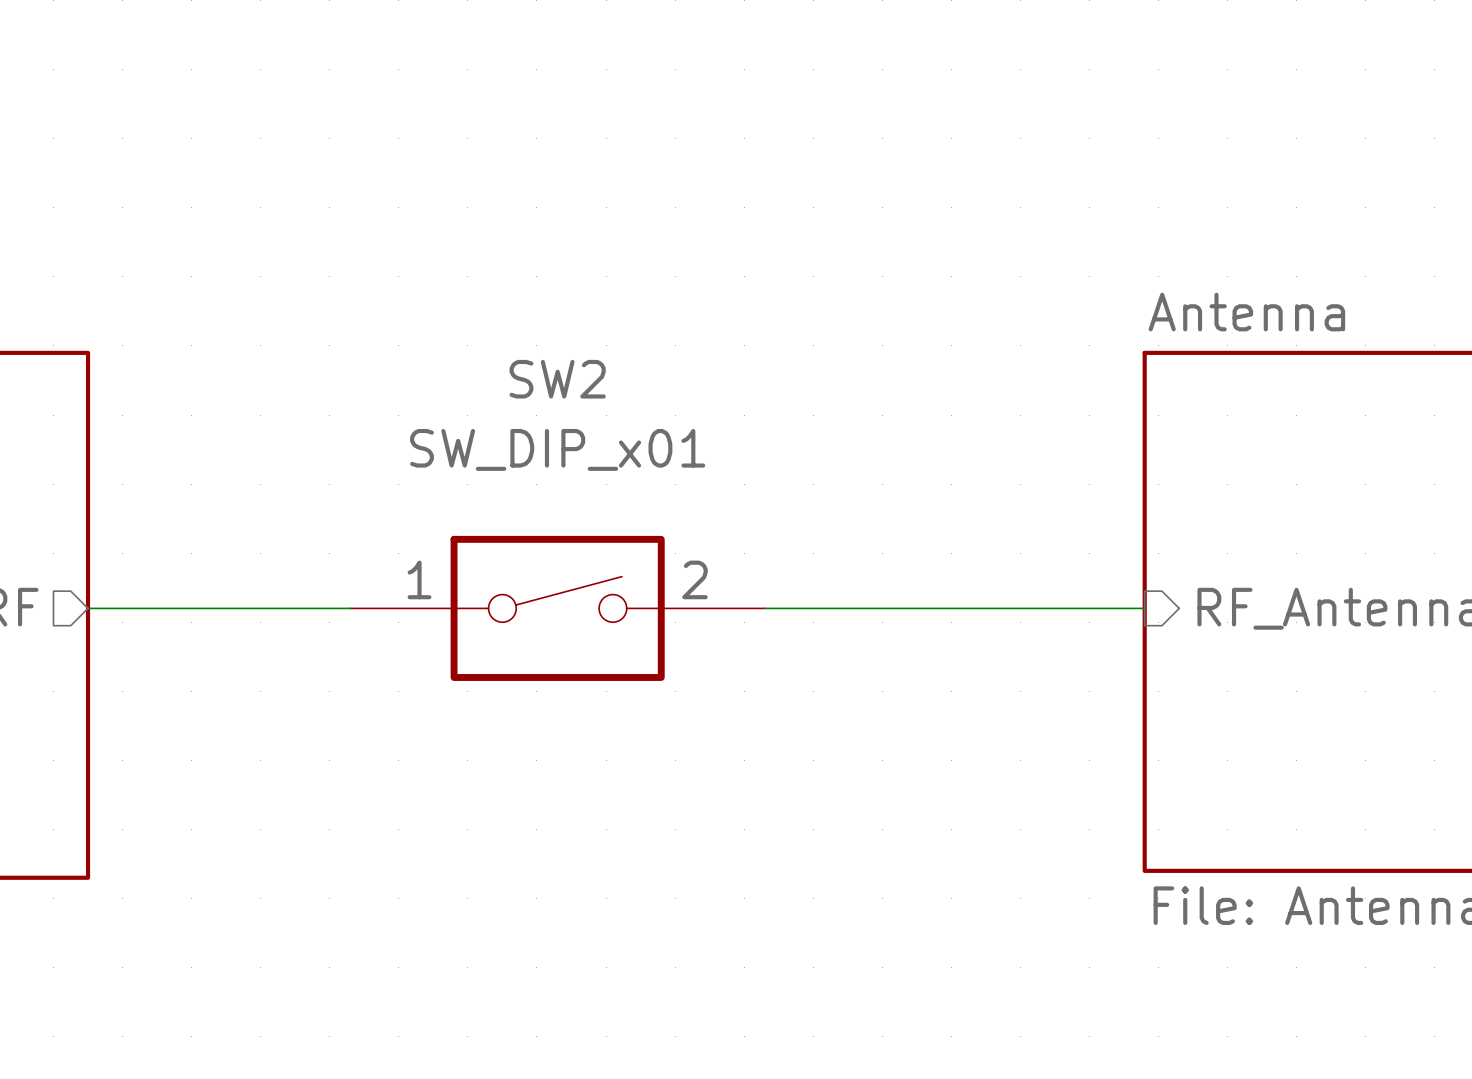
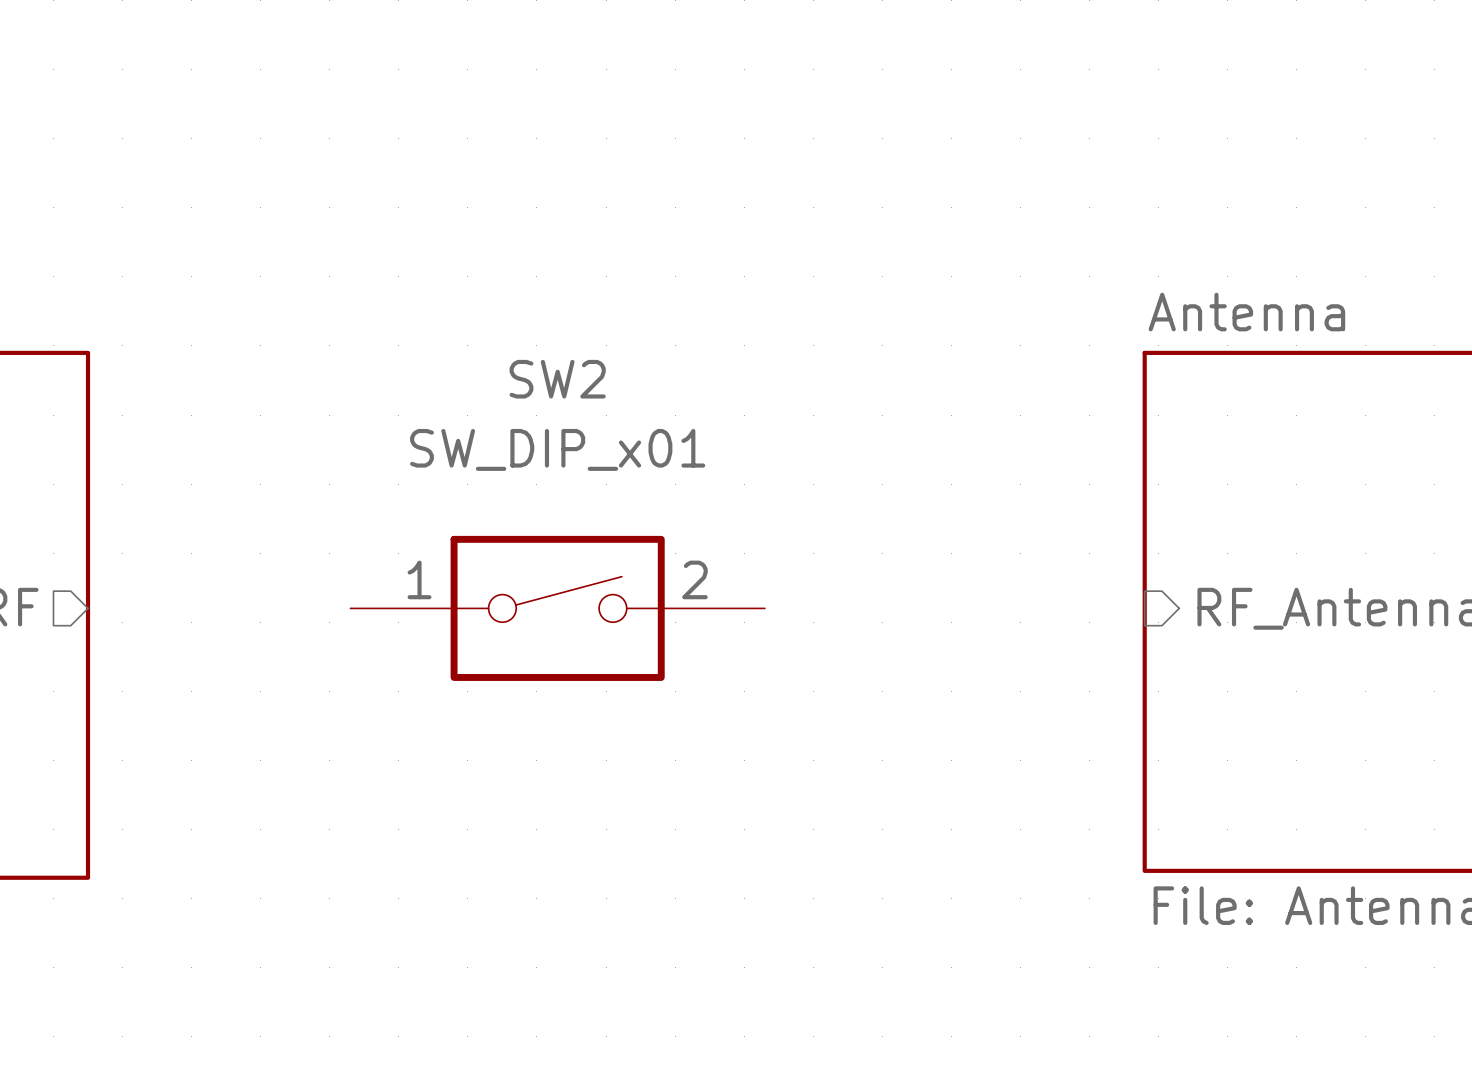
wire: (88, 608) (350, 608) -> none
wire: (764, 608) (1144, 608) -> none

